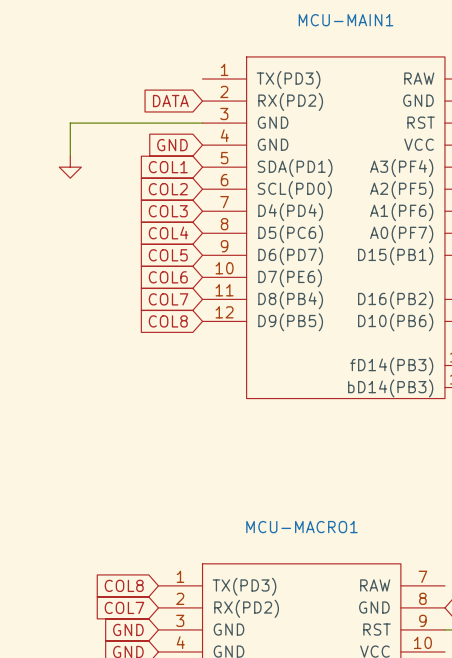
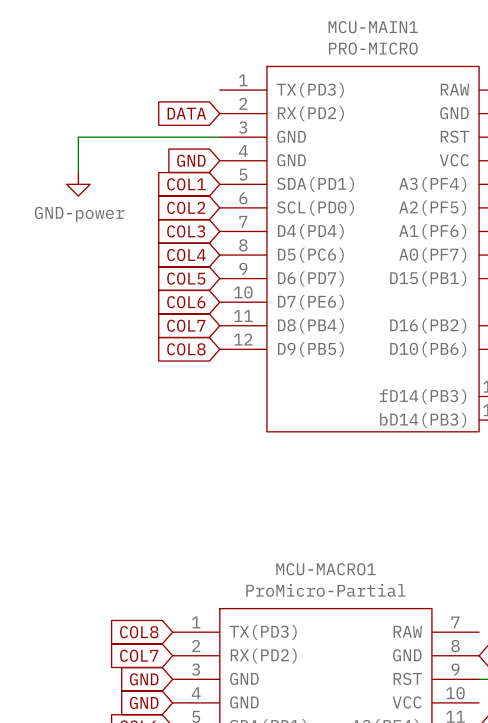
MCU-MAIN1 value: none -> PRO-MICRO (373, 48)
power symbol text: none -> GND-power (79, 214)
MCU-MACRO1 value: none -> ProMicro-Partial (325, 590)

